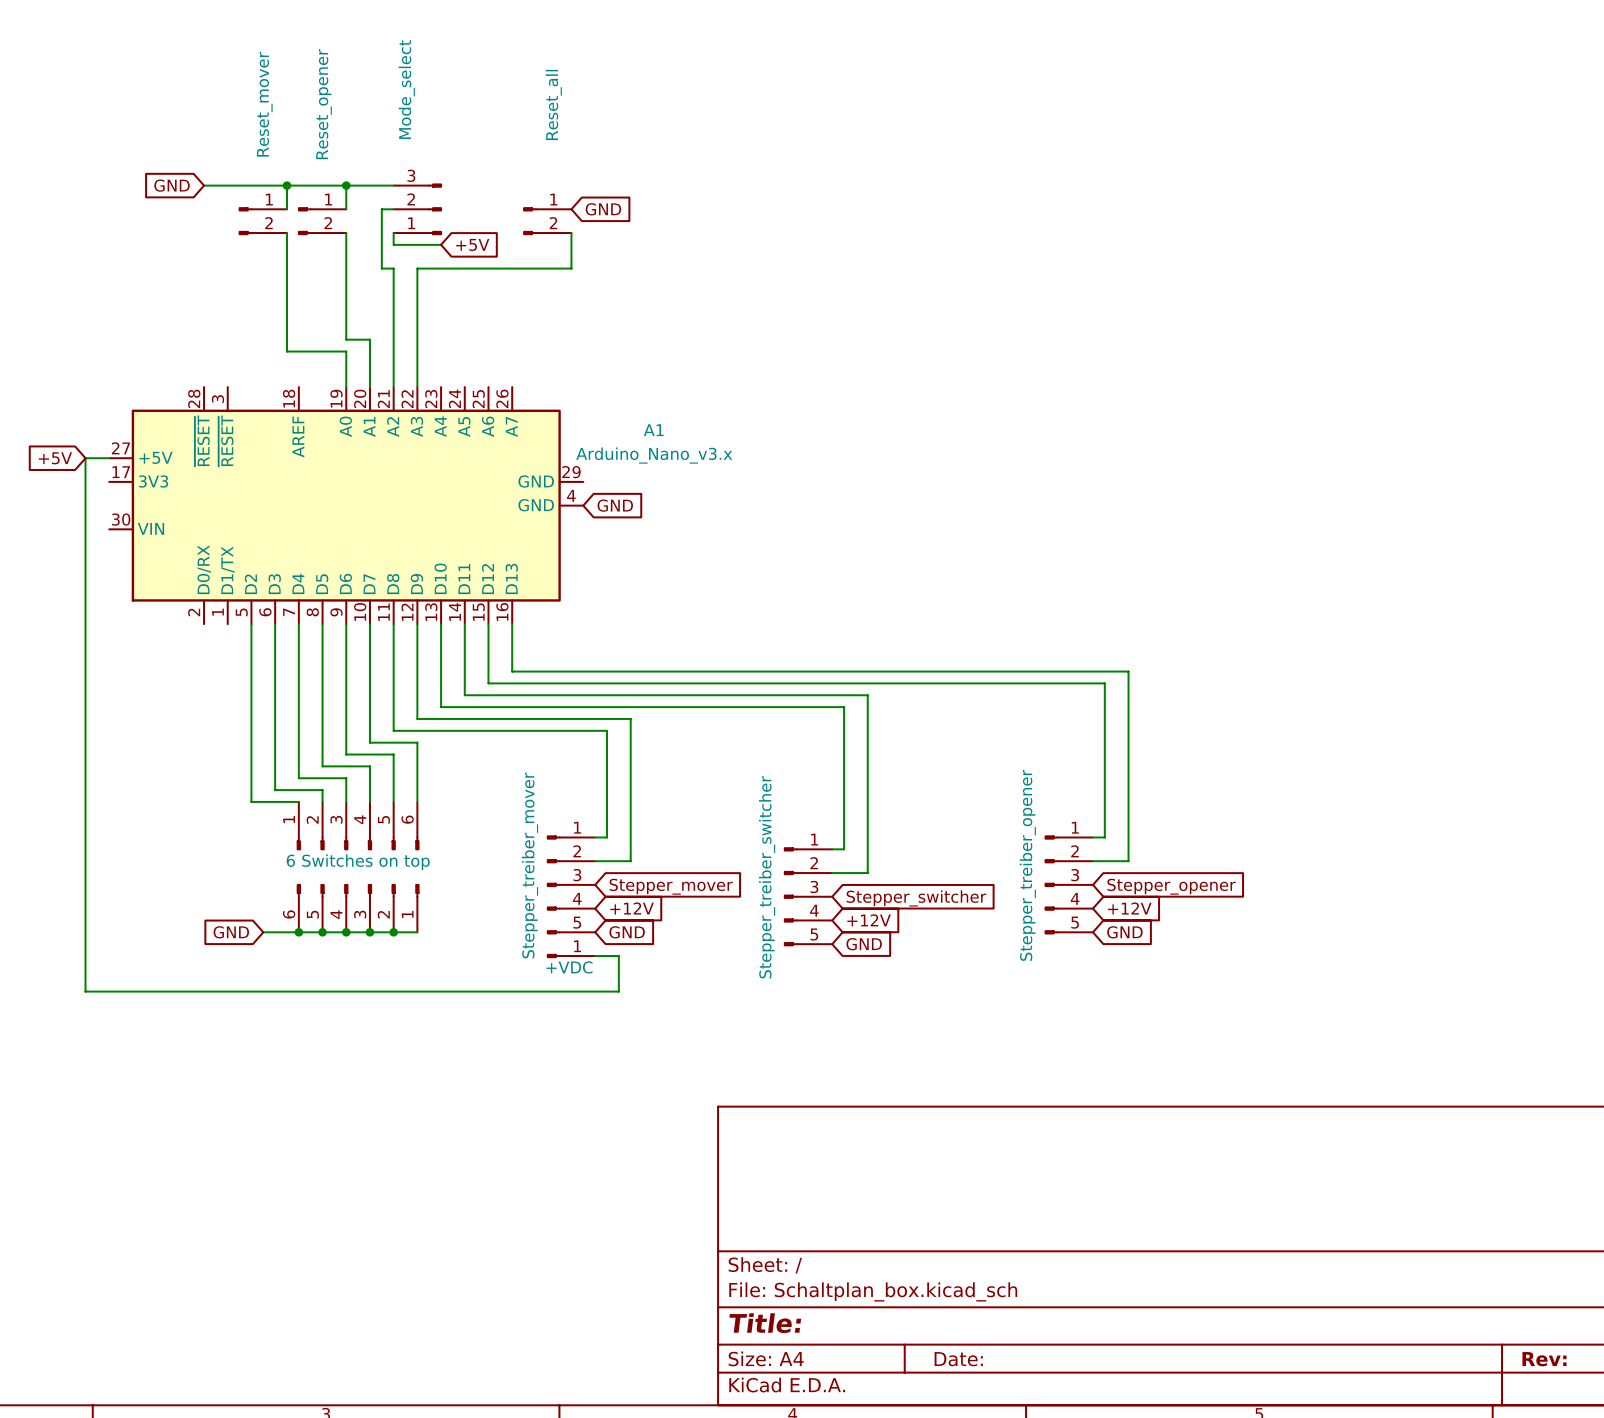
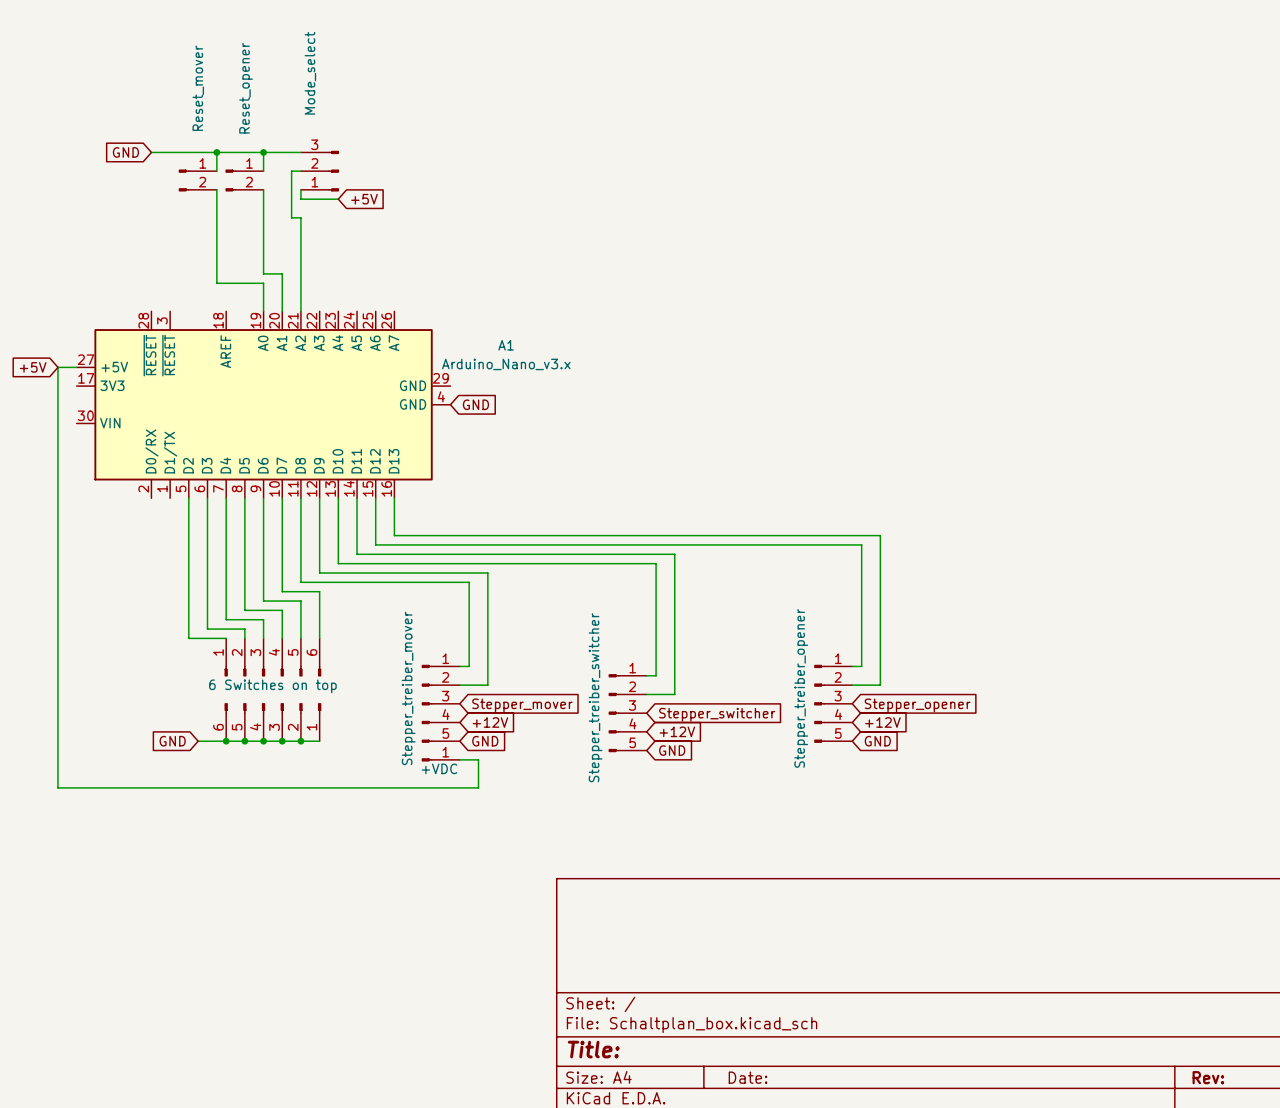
global label: GND (603, 209) -> none
part: Reset_all (547, 221) -> none
wire: (571, 233) (571, 268) (417, 268) (417, 387) -> none

